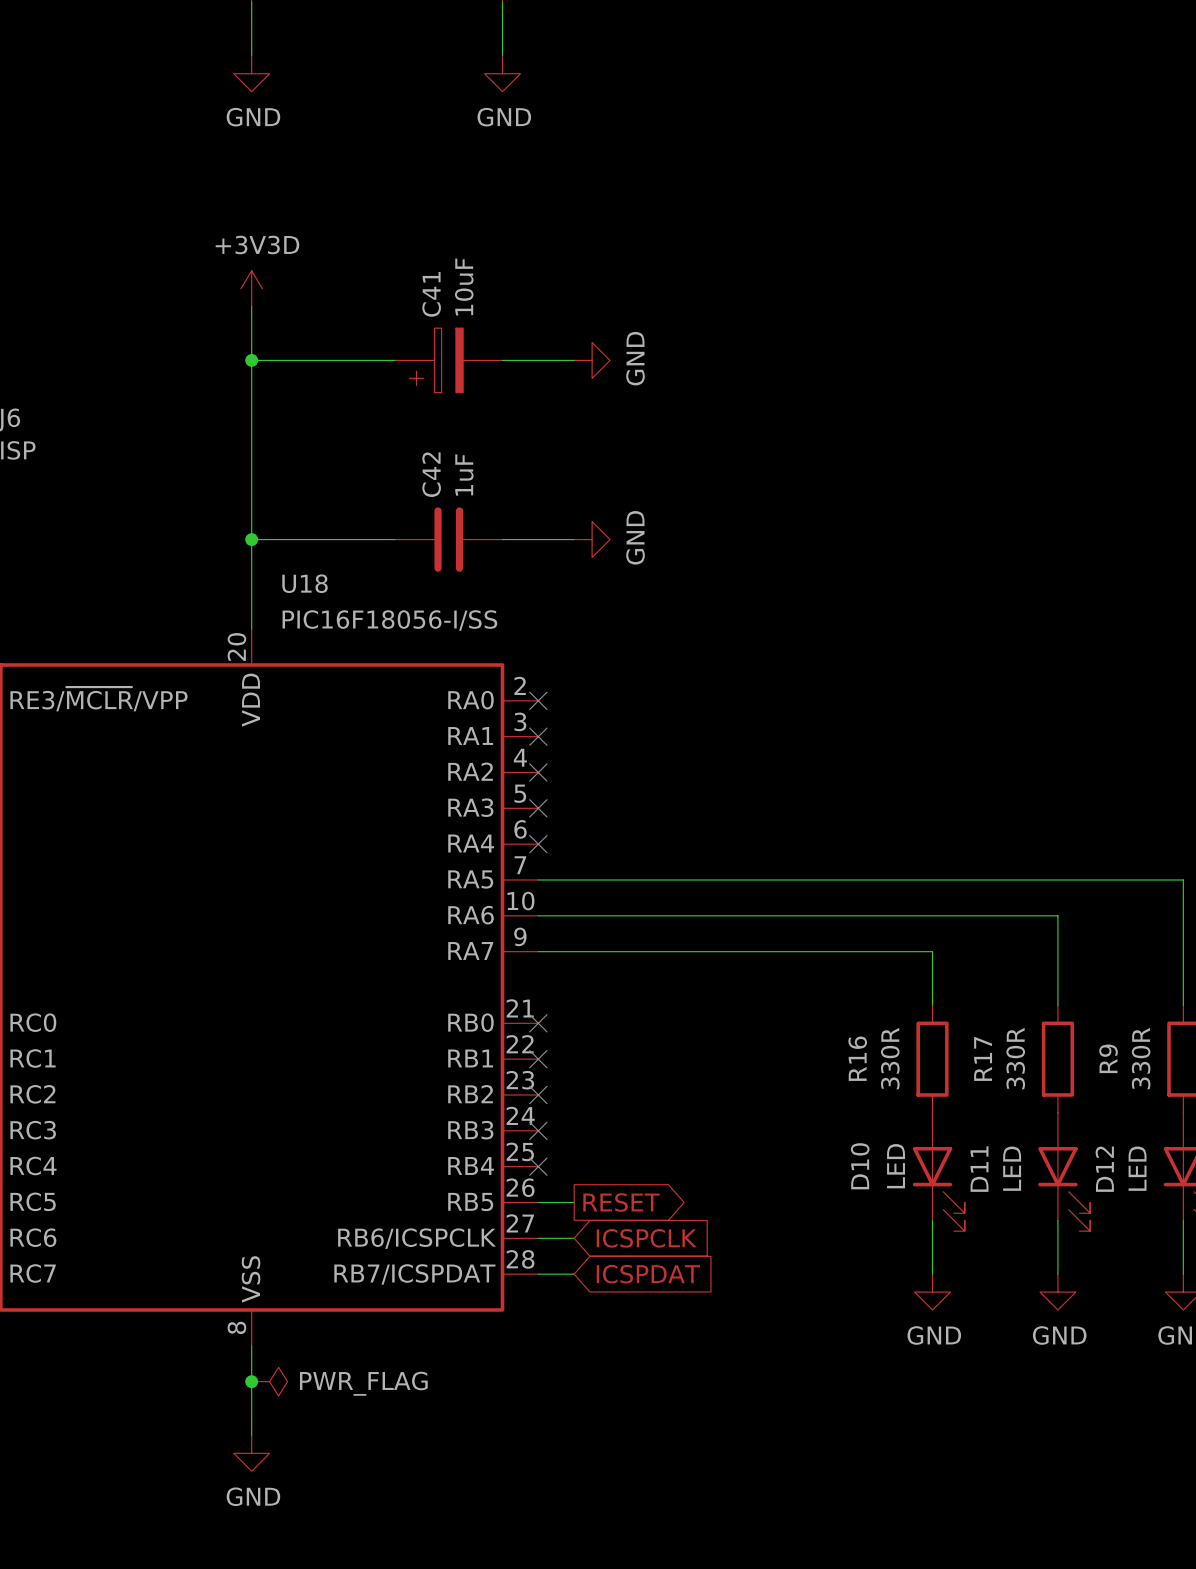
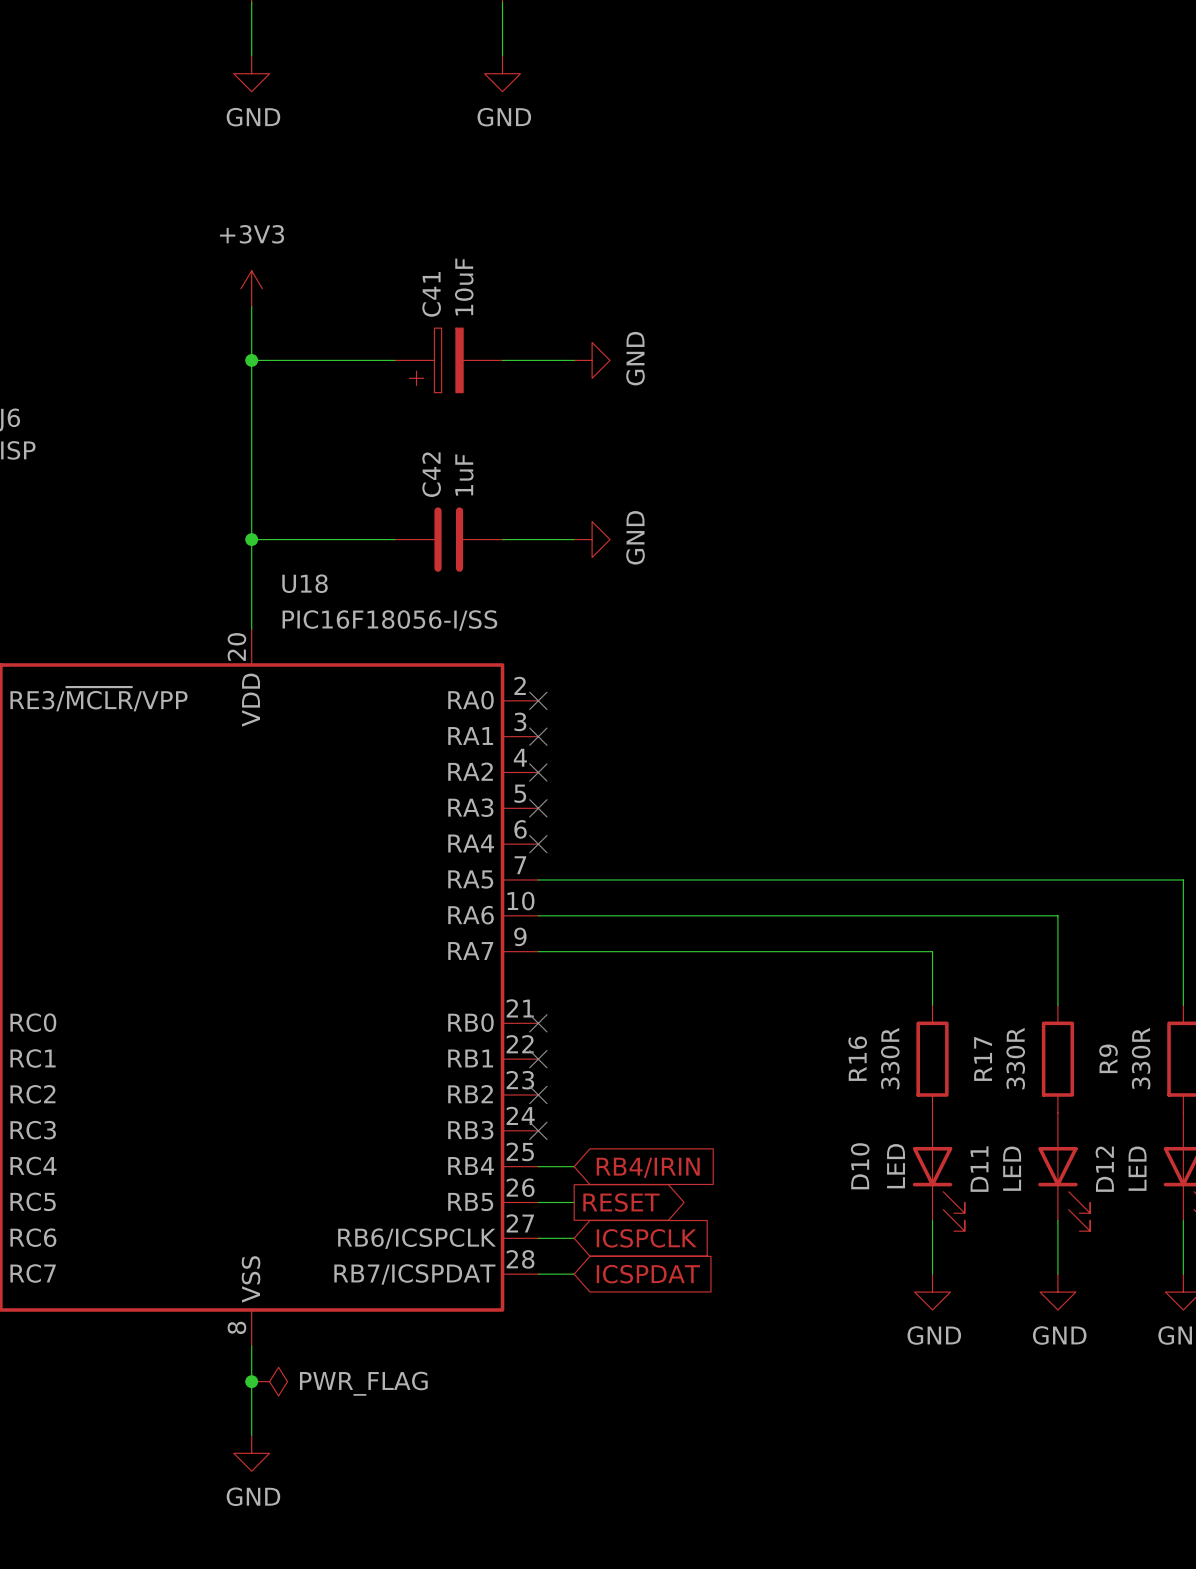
power symbol: +3V3D (251, 288) -> +3V3 (251, 288)
wire: none -> (538, 1166) (574, 1166)
no-connect mark: (538, 1166) -> none
global label: none -> RB4/IRIN (648, 1167)

